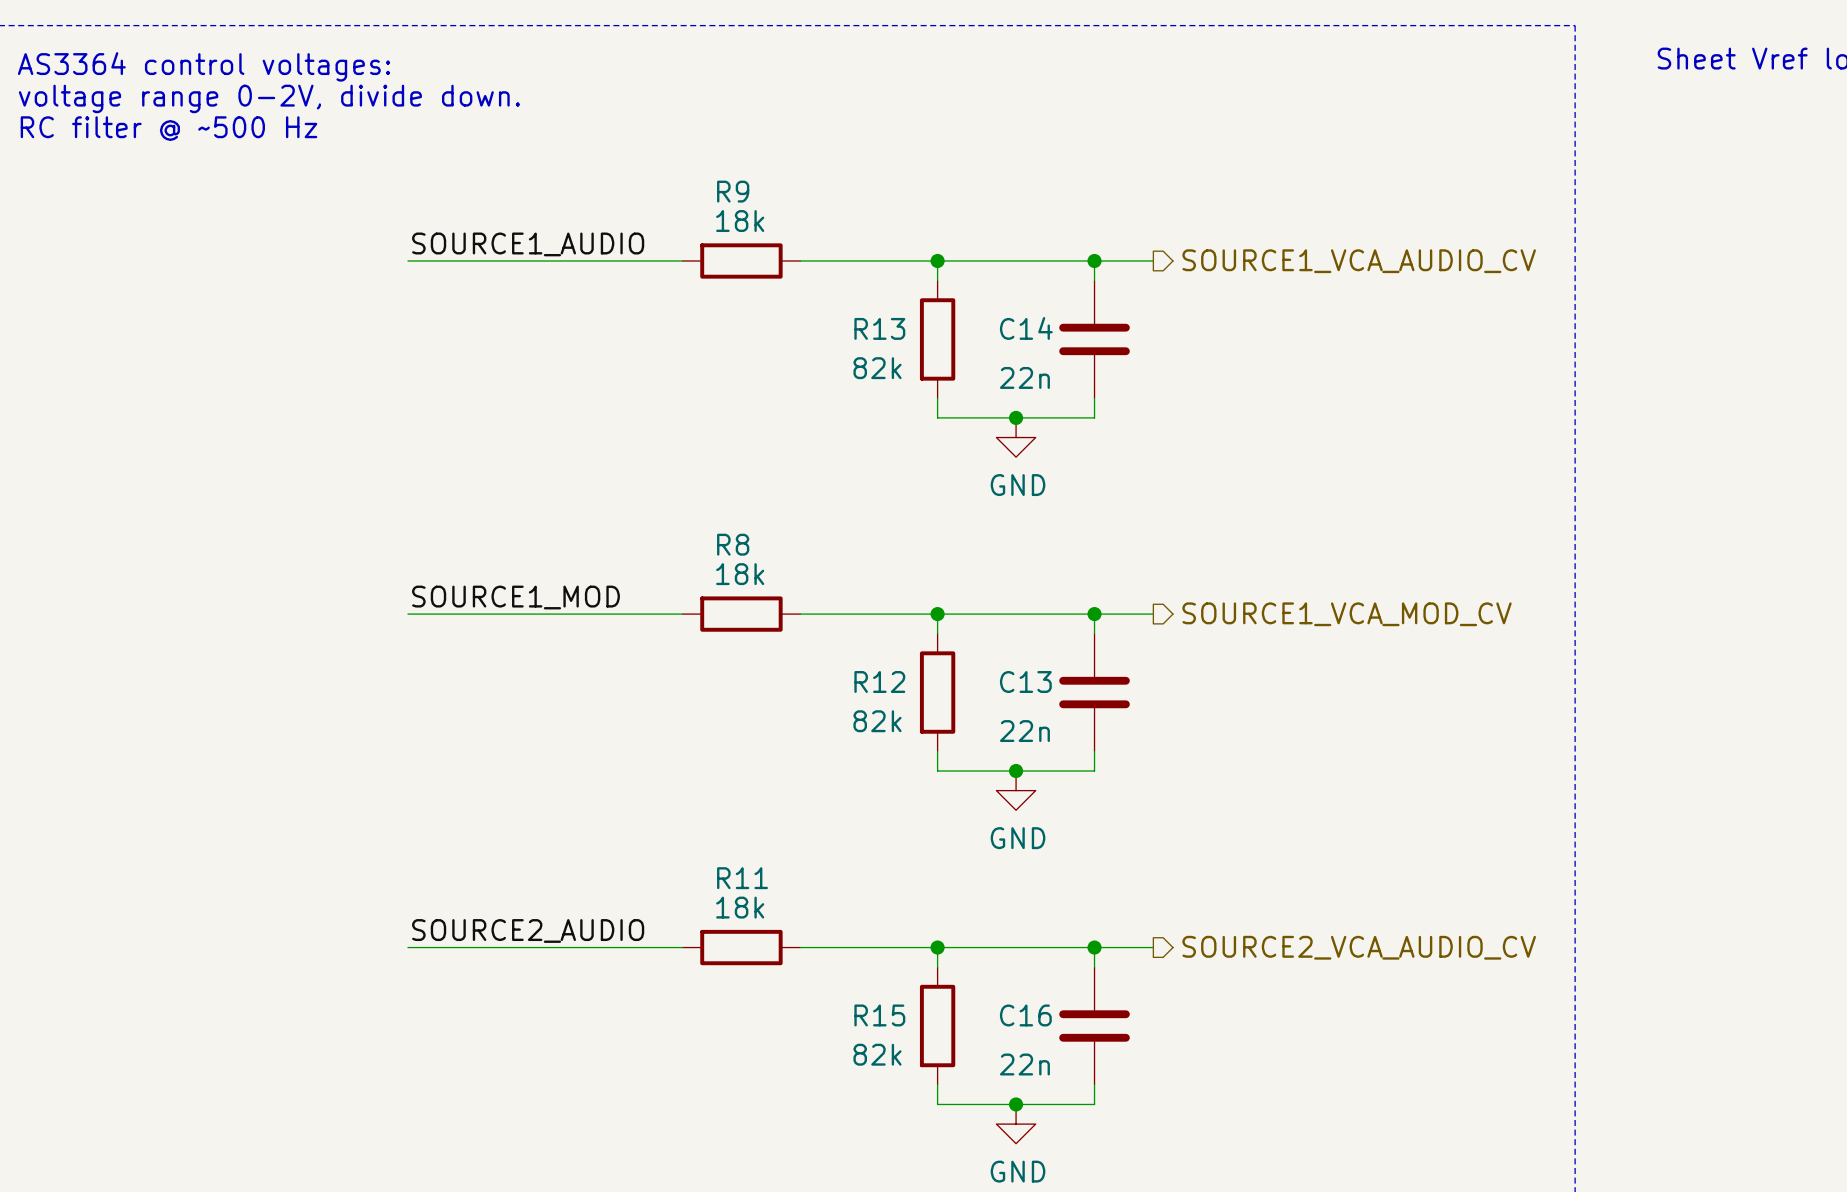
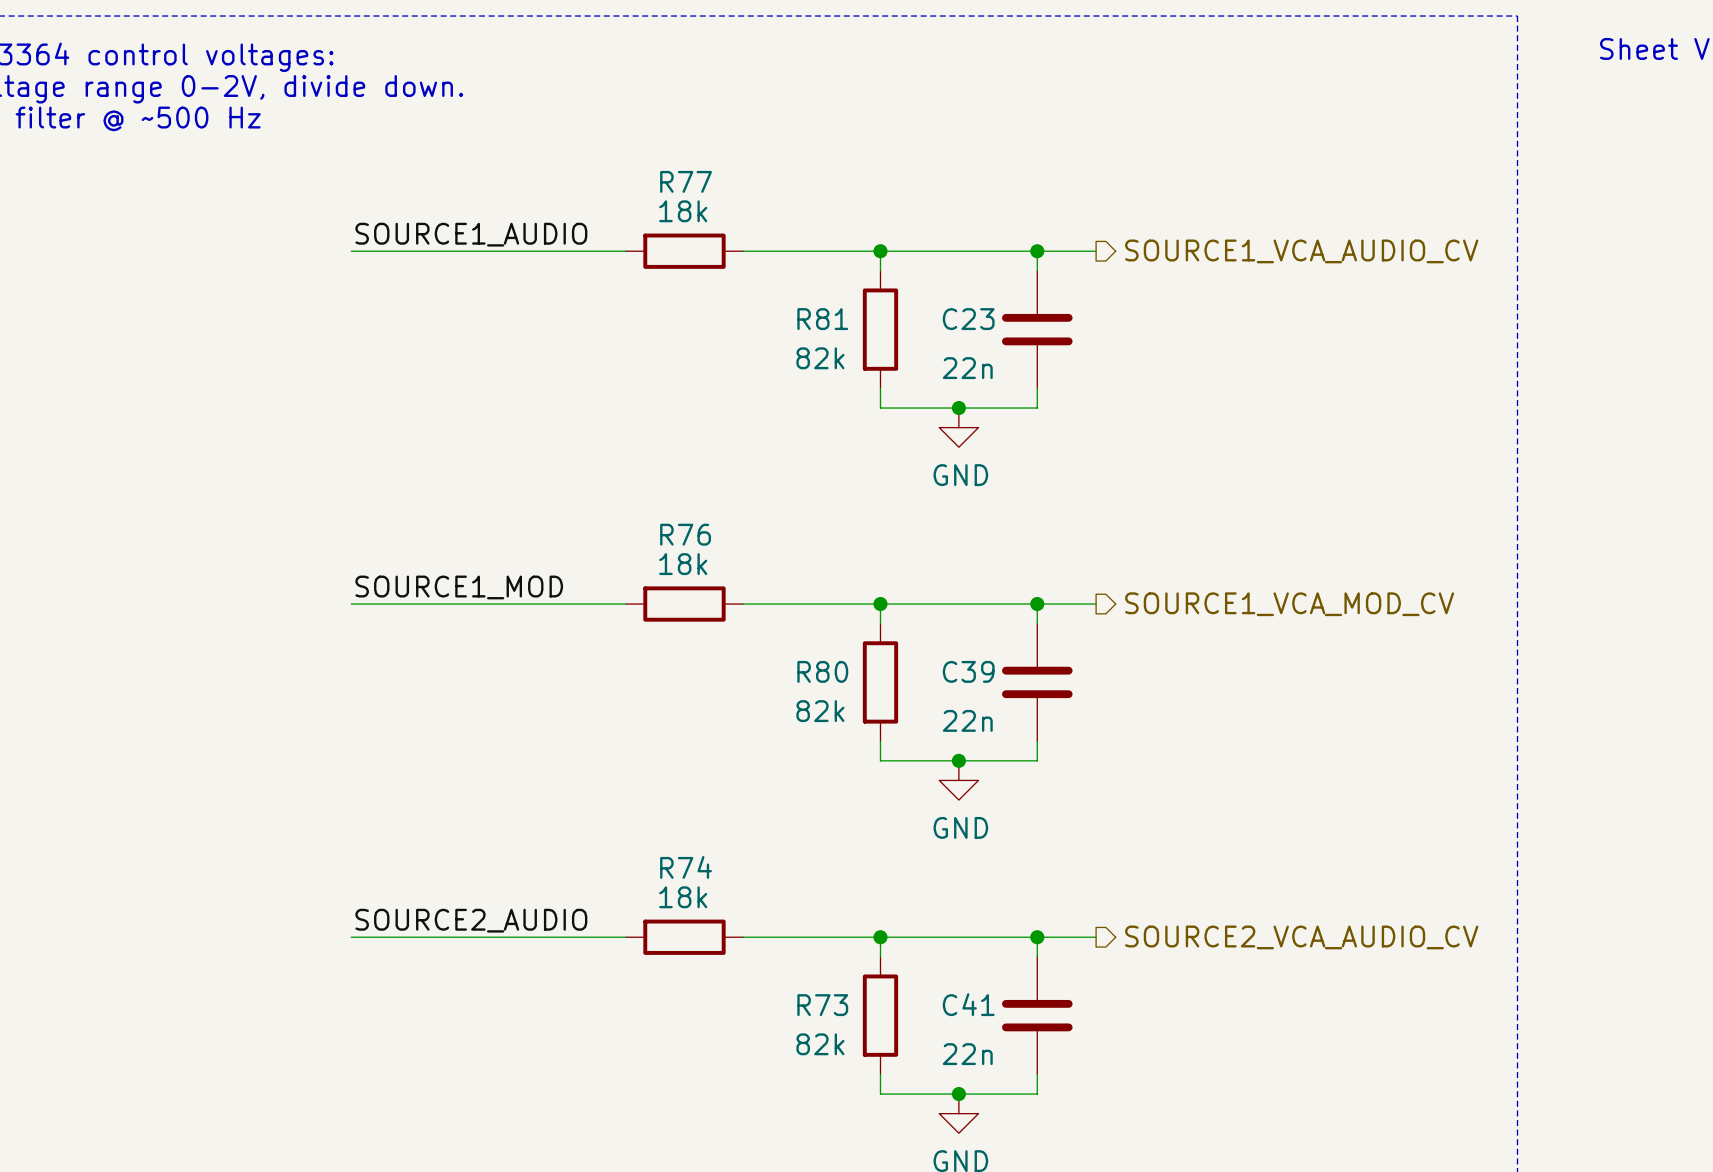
R9 name: R9 (733, 191) -> R77 (686, 181)
R13 name: R13 (879, 328) -> R81 (822, 319)
C14 name: C14 (1026, 328) -> C23 (968, 319)
R8 name: R8 (733, 544) -> R76 (685, 534)
R12 name: R12 (879, 682) -> R80 (822, 671)
C13 name: C13 (1025, 682) -> C39 (968, 671)
R11 name: R11 (742, 878) -> R74 (686, 867)
R15 name: R15 (879, 1015) -> R73 (822, 1005)
C16 name: C16 (1025, 1015) -> C41 (968, 1004)

